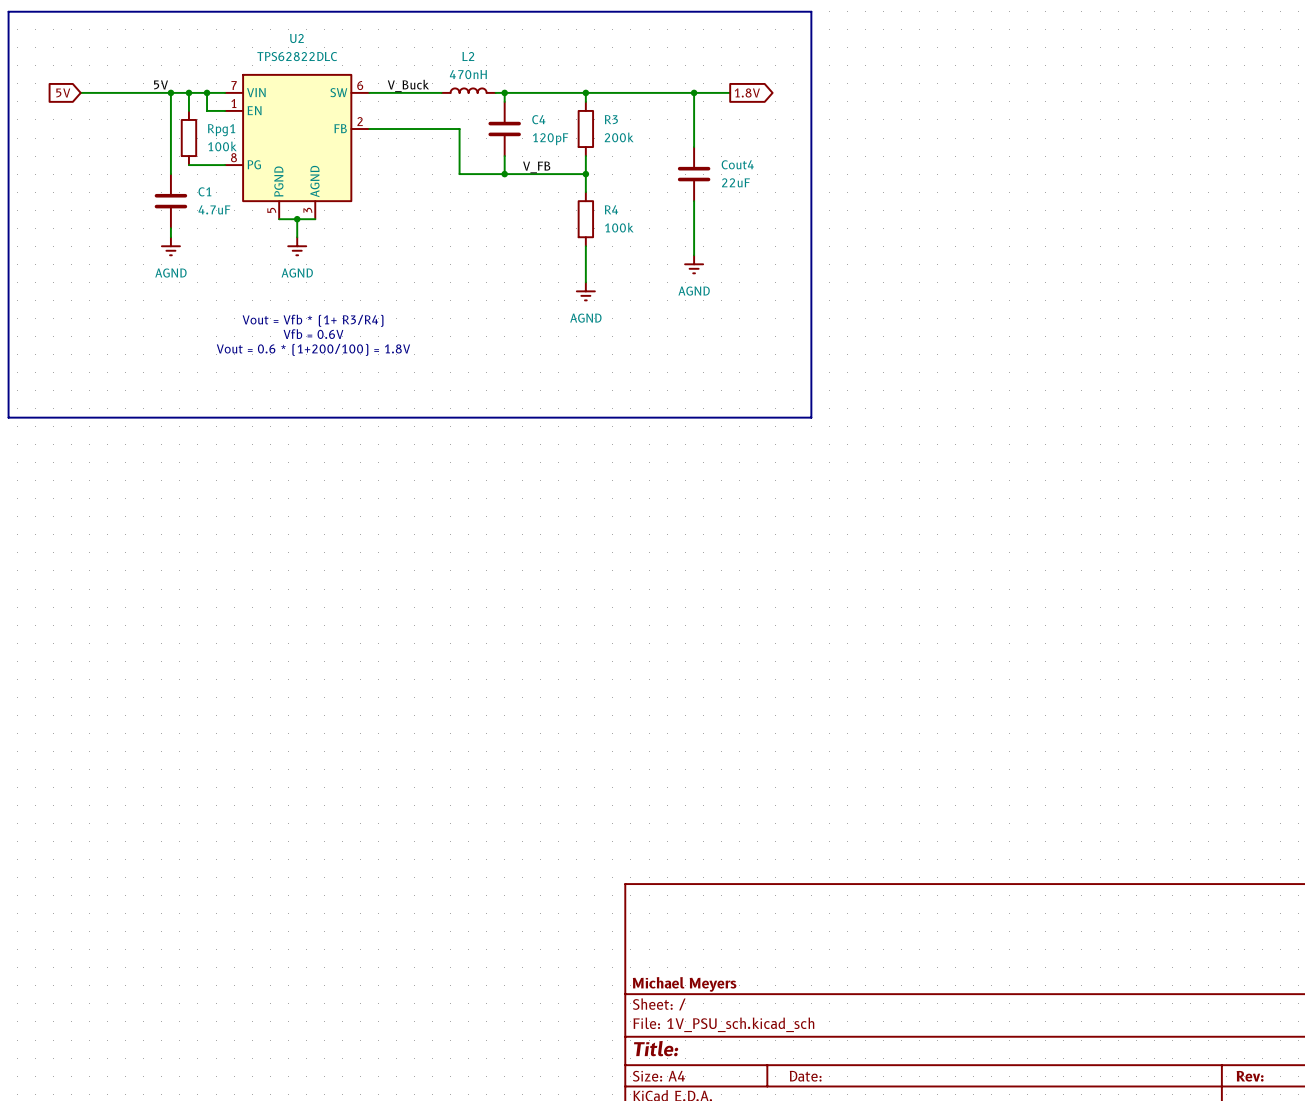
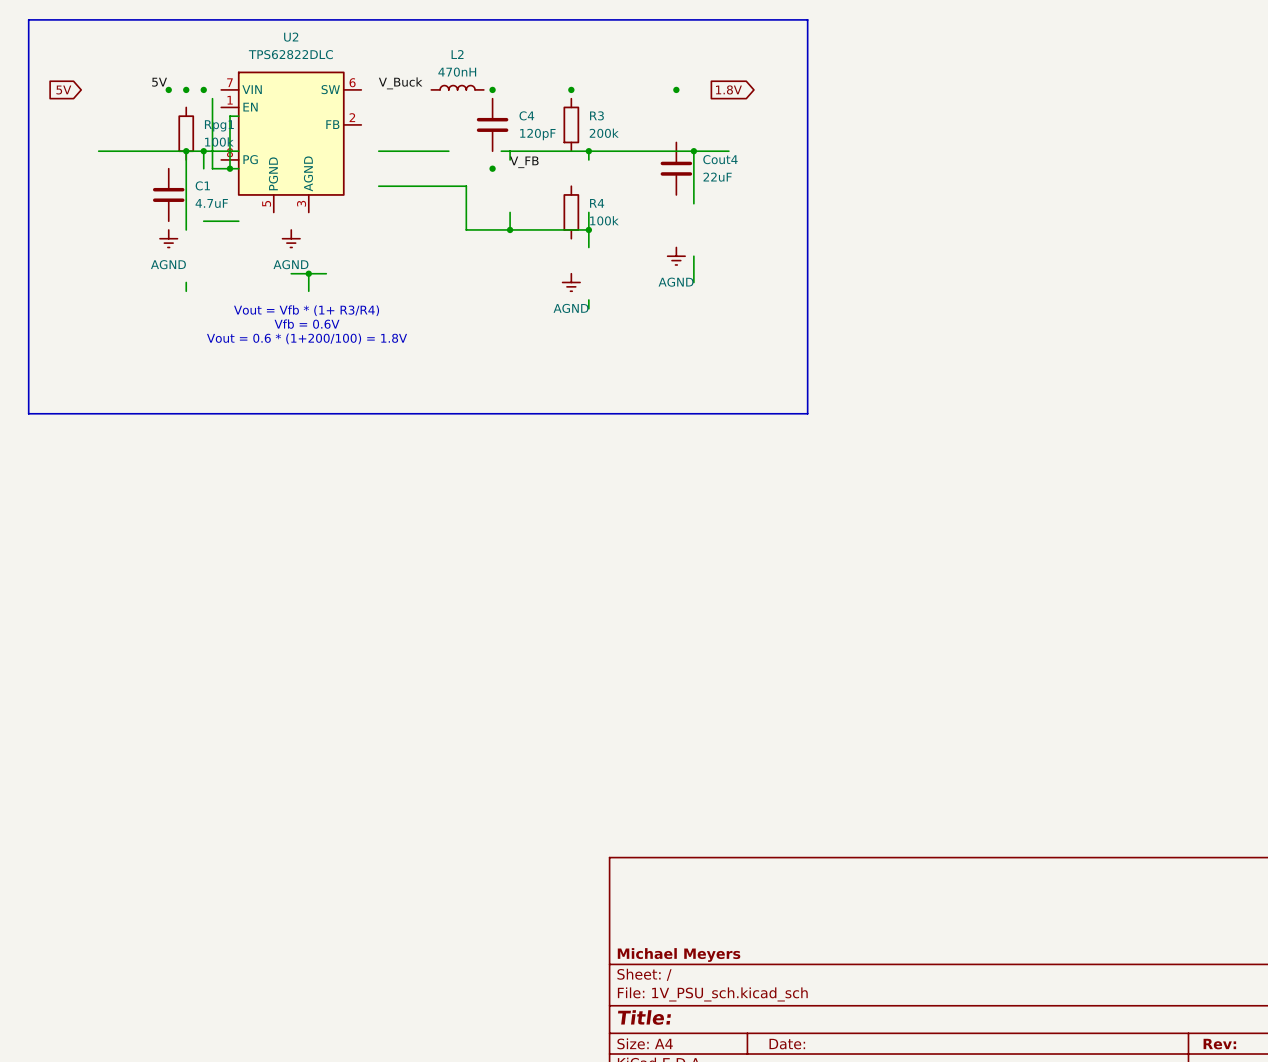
line: (8, 11) (811, 11) (811, 417) (8, 417) (8, 11) -> (28, 19) (807, 19) (807, 413) (28, 413) (28, 19)
wire: (80, 92) (225, 92) -> (98, 151) (238, 151)
wire: (170, 92) (170, 174) -> (186, 151) (186, 229)
wire: (188, 92) (188, 110) -> (203, 151) (203, 168)
wire: (207, 92) (207, 110) (225, 110) -> none
wire: (369, 92) (441, 92) -> (378, 151) (448, 151)
wire: (495, 92) (730, 92) -> (501, 151) (728, 151)
wire: (504, 92) (504, 101) -> (510, 151) (510, 159)
wire: (585, 92) (585, 101) -> (588, 151) (588, 159)
wire: (694, 92) (694, 147) -> (693, 151) (693, 203)
wire: none -> (212, 98) (212, 168) (238, 168)
wire: none -> (238, 116) (230, 116) (230, 168)
wire: (369, 129) (459, 129) (459, 174) (585, 174) -> (378, 186) (466, 186) (466, 229) (588, 229)
junction: none -> (186, 151)
junction: none -> (203, 151)
wire: (504, 156) (504, 174) -> (510, 212) (510, 229)
wire: (585, 156) (585, 192) -> (588, 212) (588, 247)
junction: none -> (693, 151)
wire: (188, 165) (225, 165) -> (203, 221) (238, 221)
junction: none -> (230, 168)
junction position: (585, 174) -> (588, 151)
wire: (694, 201) (694, 255) -> none
wire: (279, 219) (315, 219) -> (291, 273) (326, 273)
wire: (297, 219) (297, 237) -> (308, 273) (308, 291)
junction: (297, 219) -> none
wire: (170, 228) (170, 237) -> (186, 282) (186, 291)
junction: none -> (510, 229)
junction: none -> (588, 229)
wire: (585, 246) (585, 282) -> none
wire: none -> (693, 256) (693, 282)
junction: none -> (308, 273)
wire: none -> (588, 299) (588, 308)

